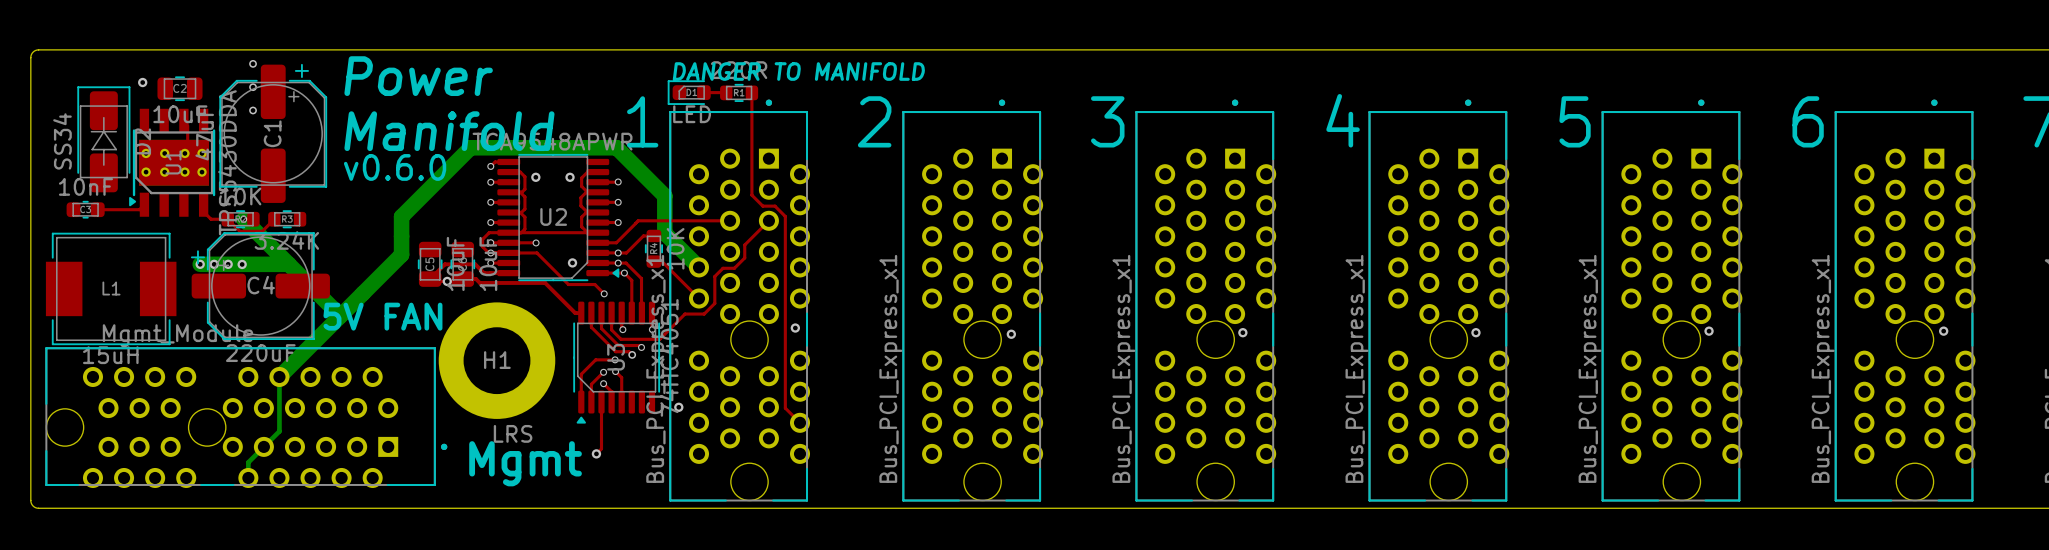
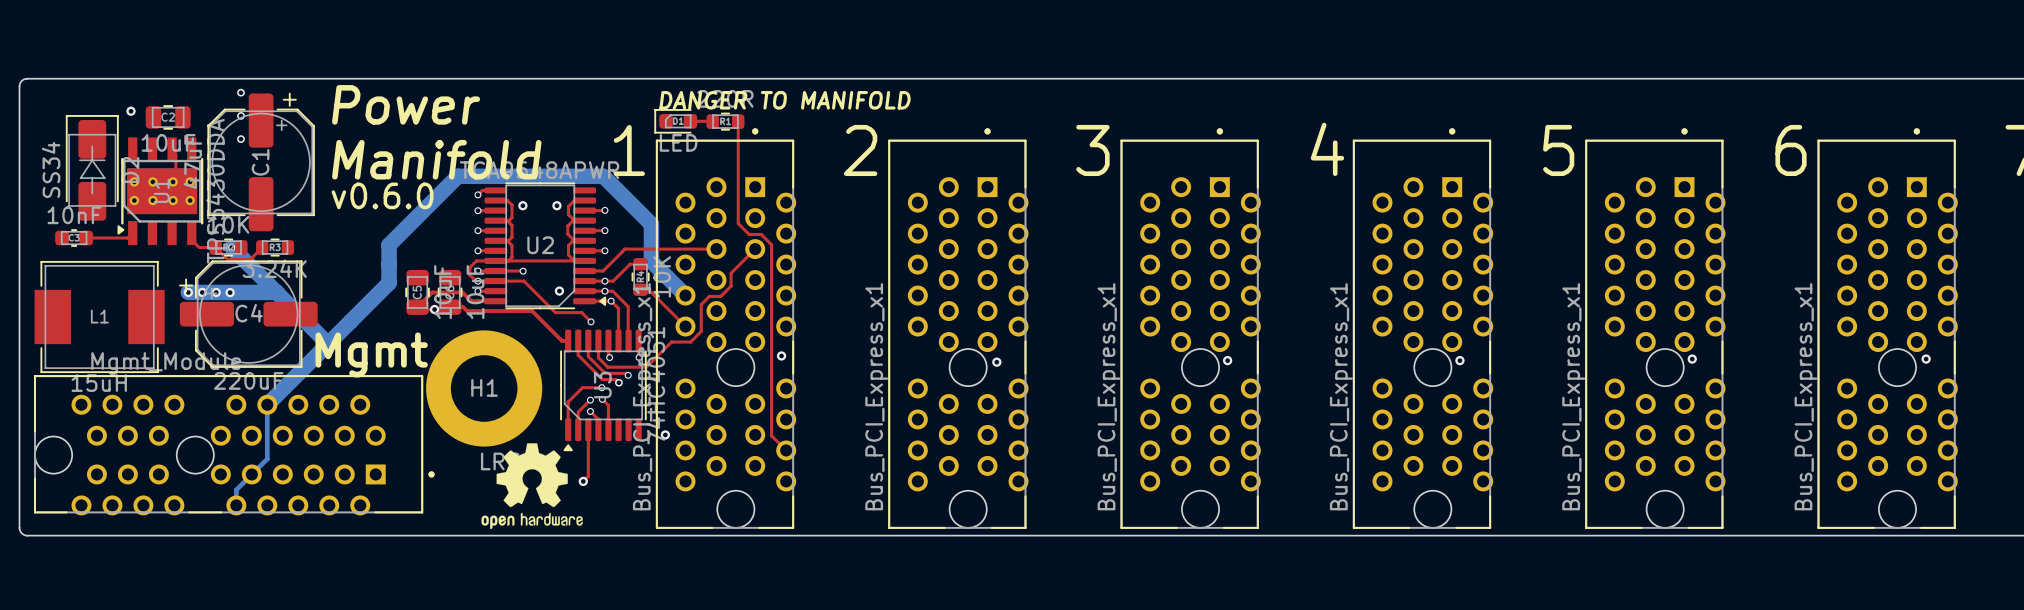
text: 5V FAN (382, 316) -> Mgmt (371, 354)
drawing: none -> [481, 443, 583, 530]
text: Mgmt (525, 463) -> none

